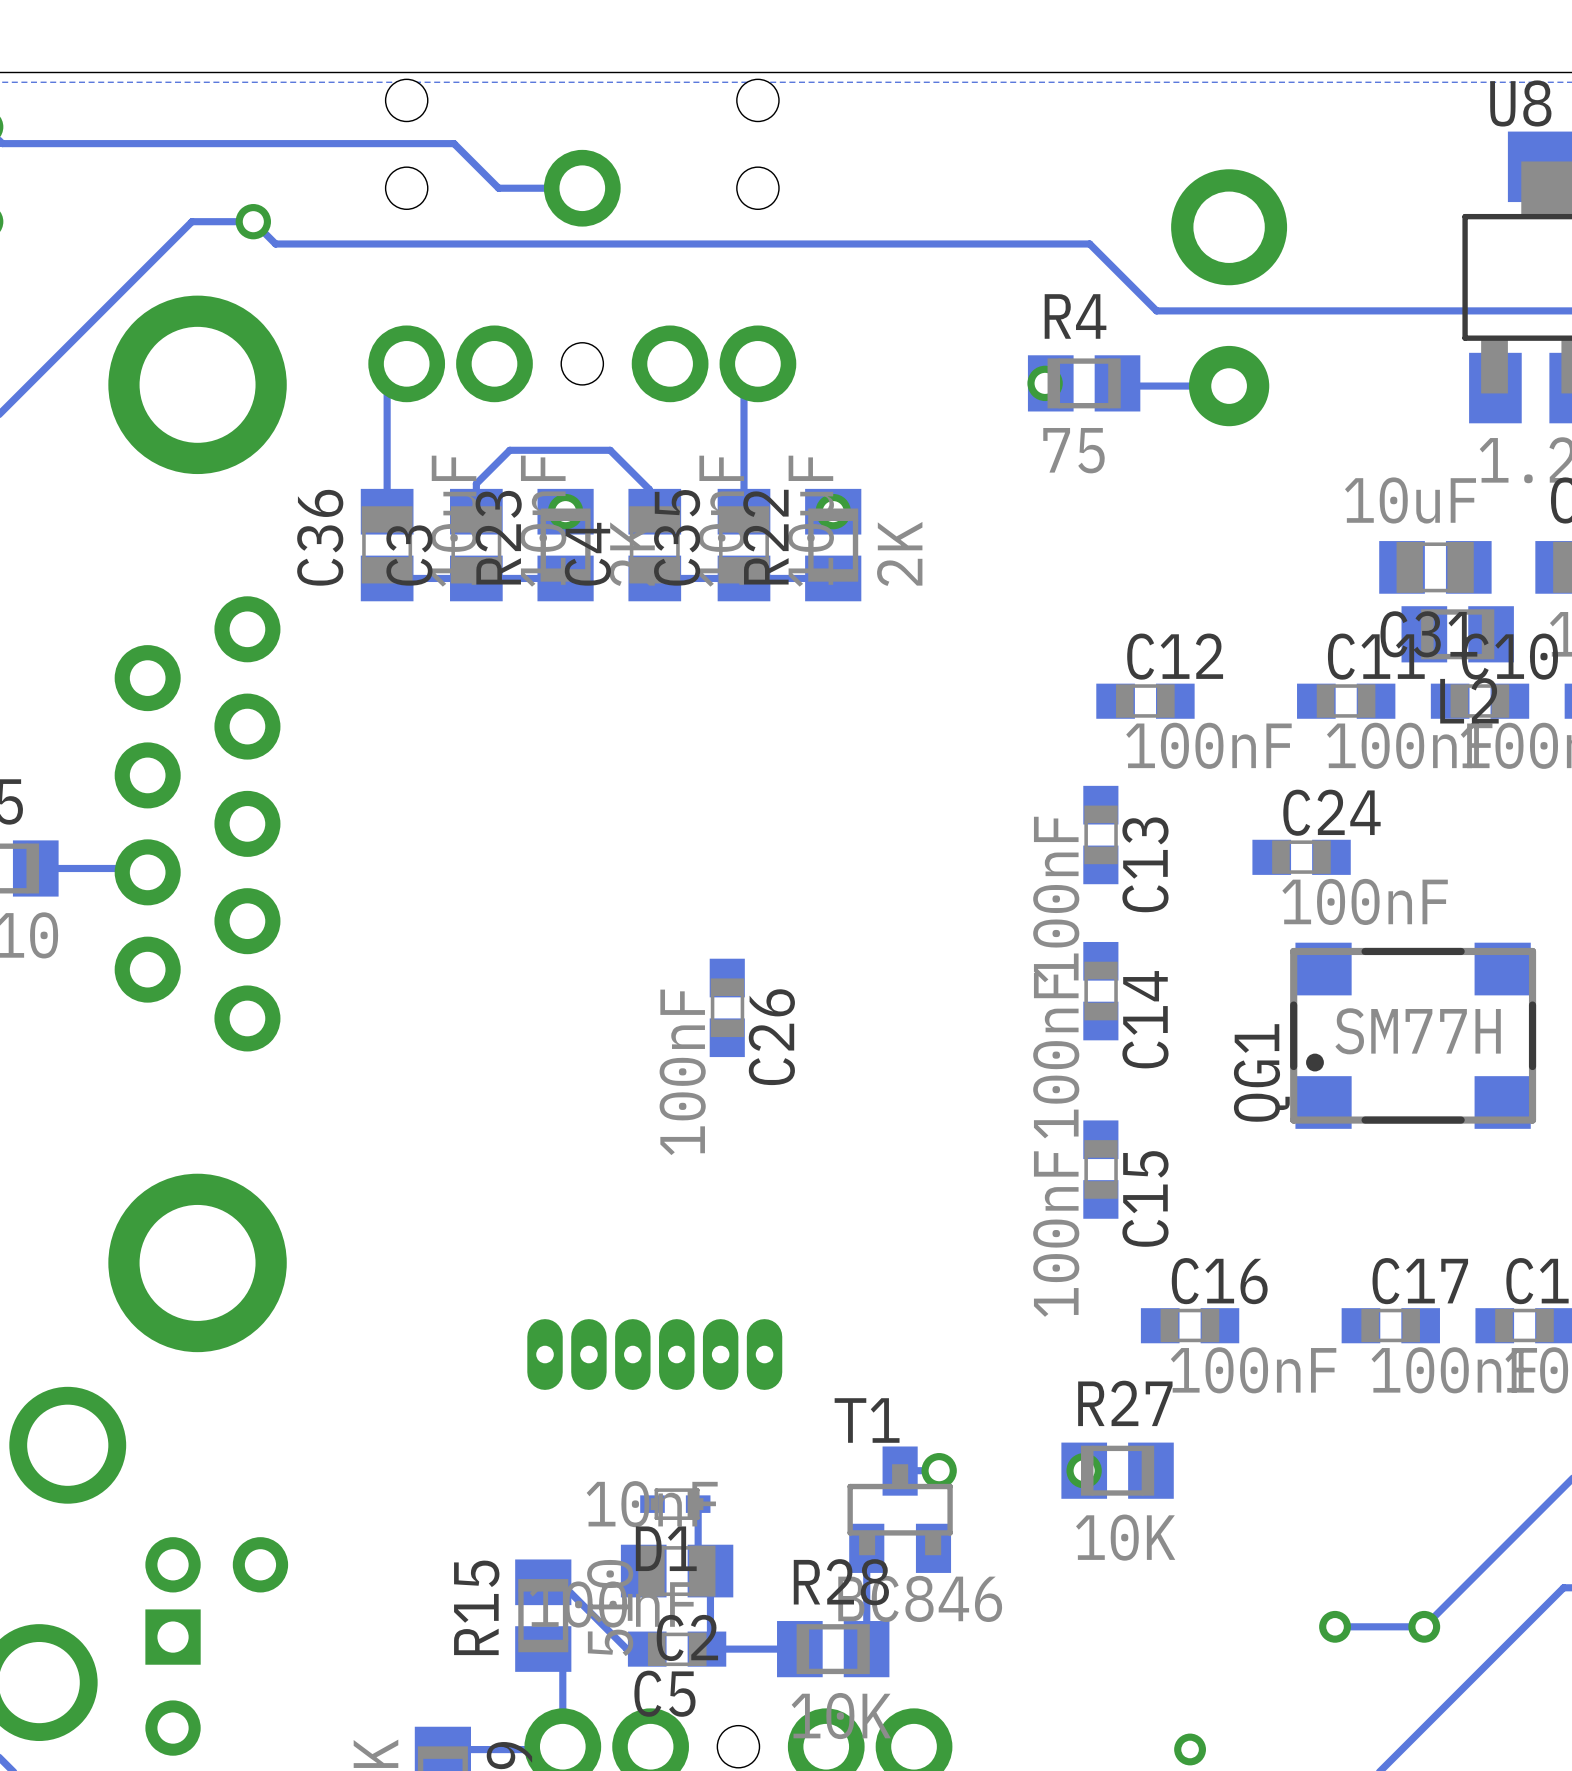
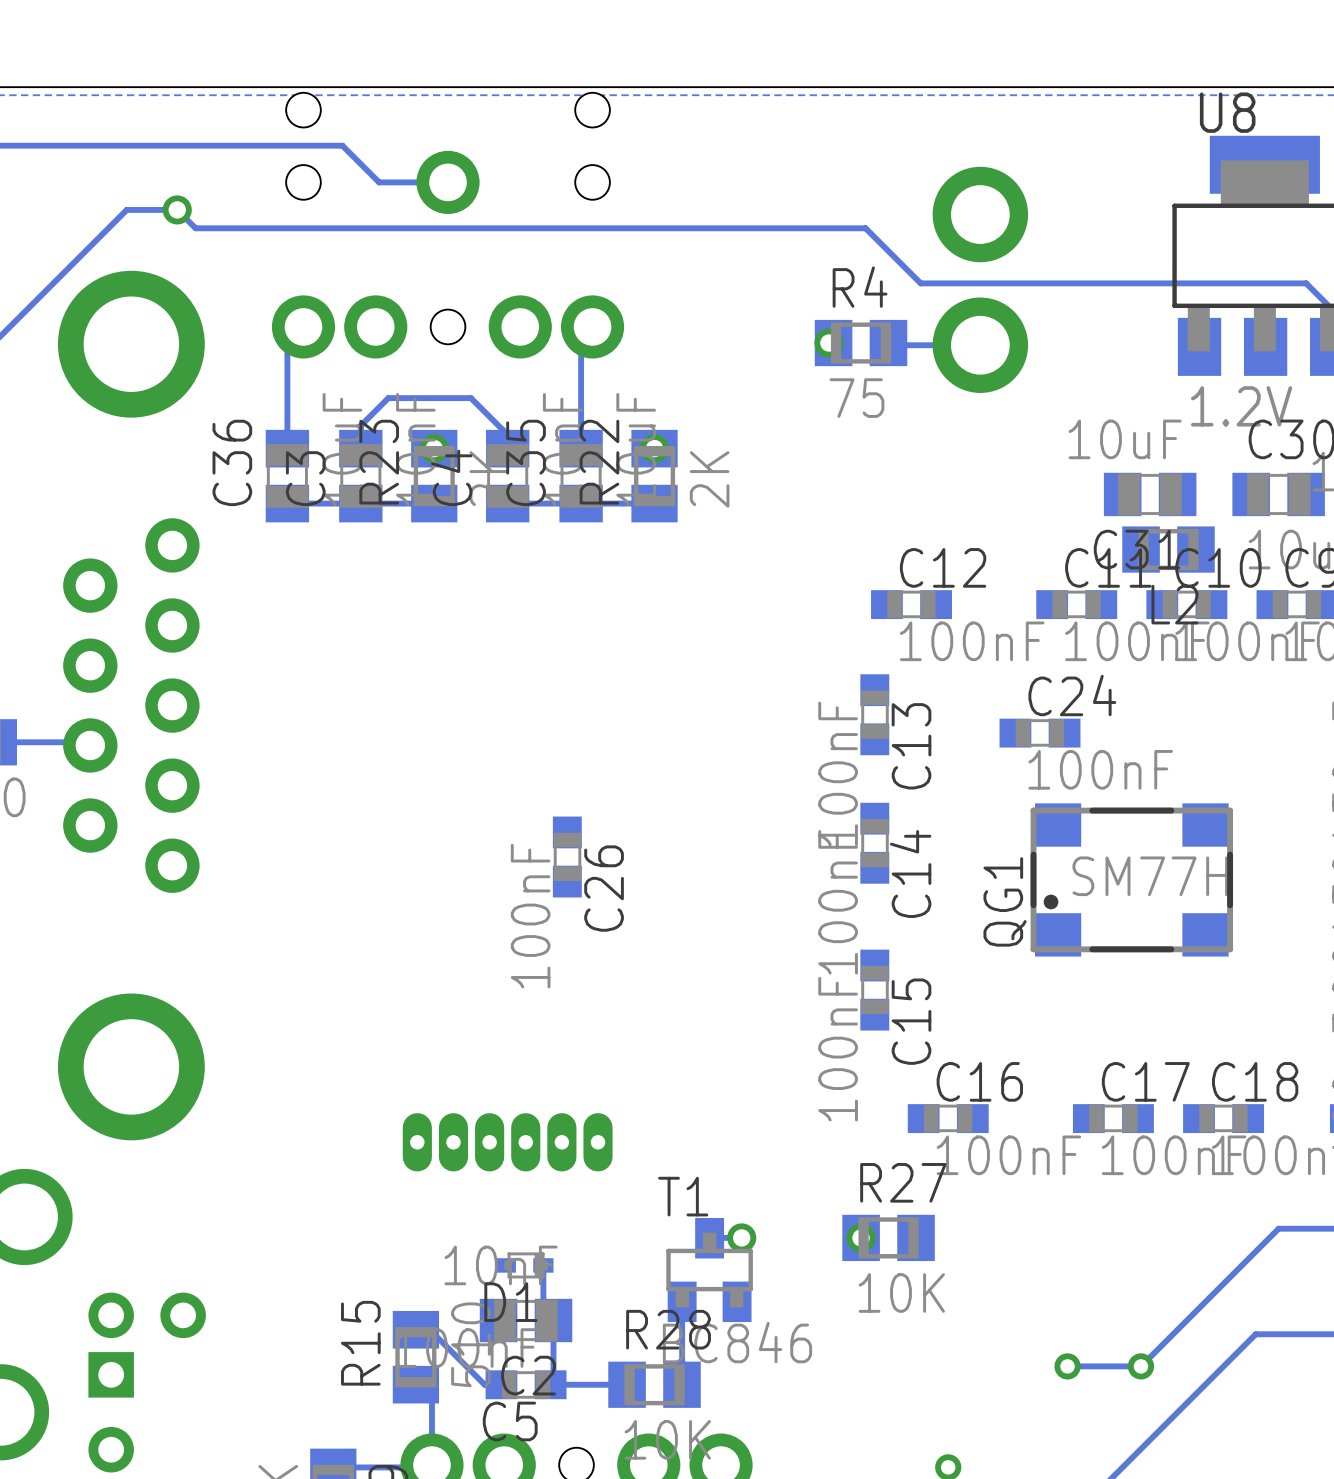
part footprint: [1171, 169, 1288, 427] -> [932, 166, 1029, 393]

